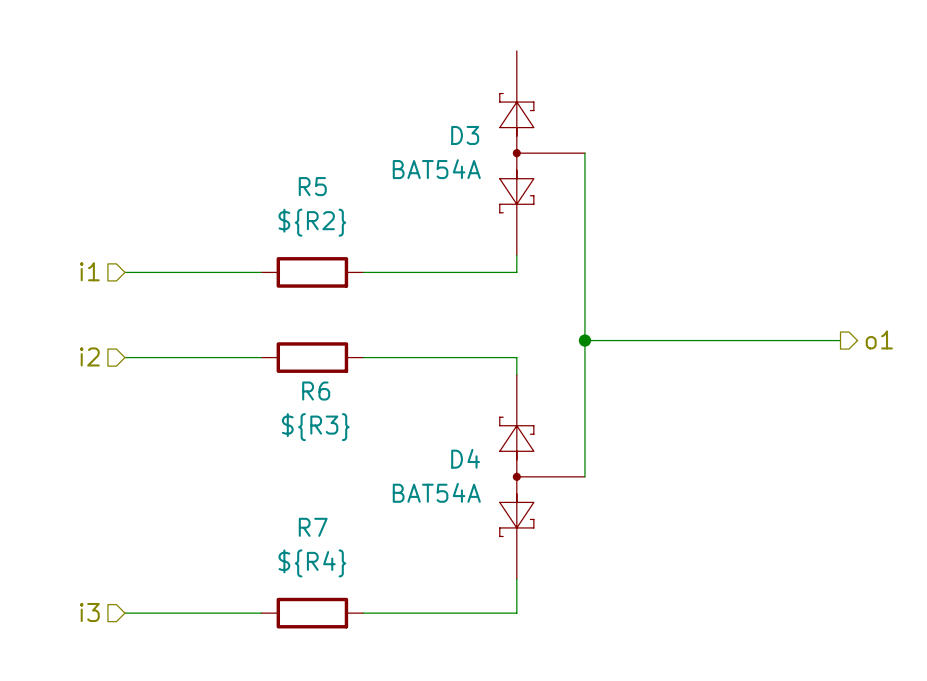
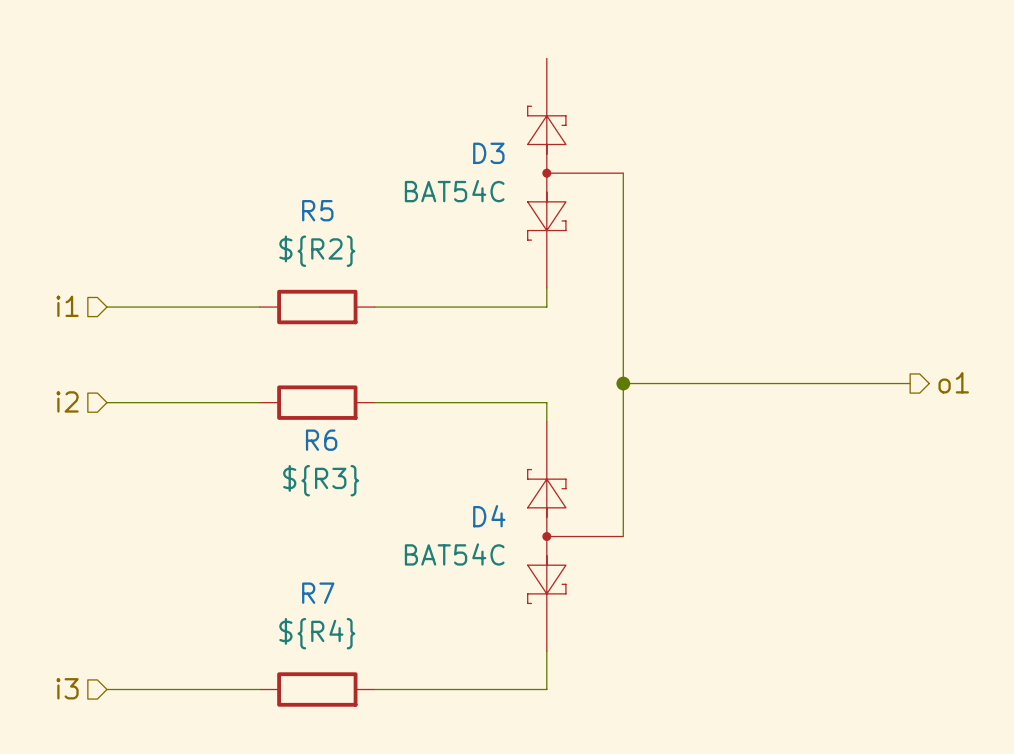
D3 value: BAT54A (436, 169) -> BAT54C (454, 191)
D4 value: BAT54A (436, 492) -> BAT54C (454, 554)

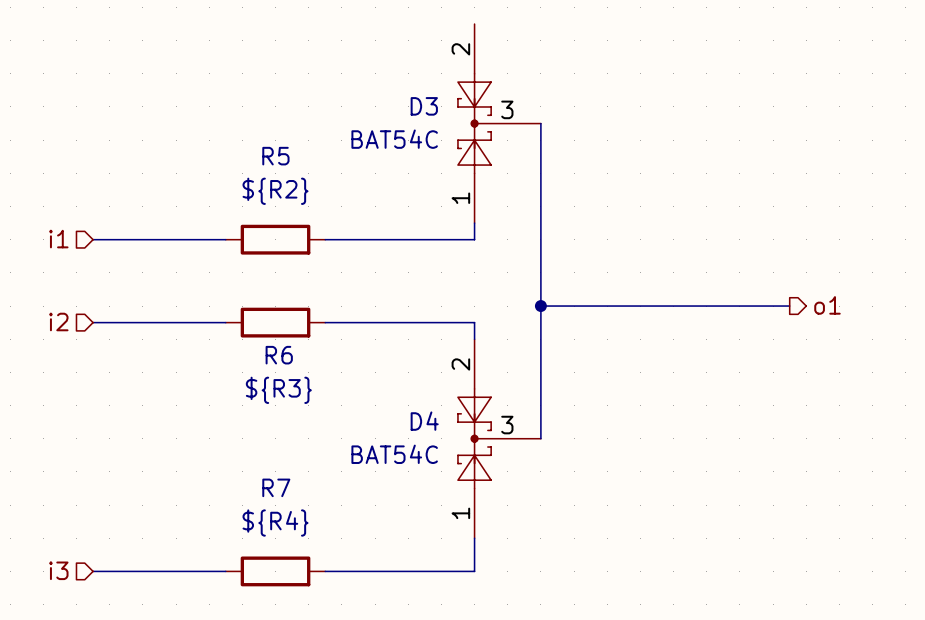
D3 symbol: [527, 58, 624, 288] -> [457, 24, 541, 224]
D4 symbol: [527, 421, 624, 652] -> [457, 339, 541, 539]

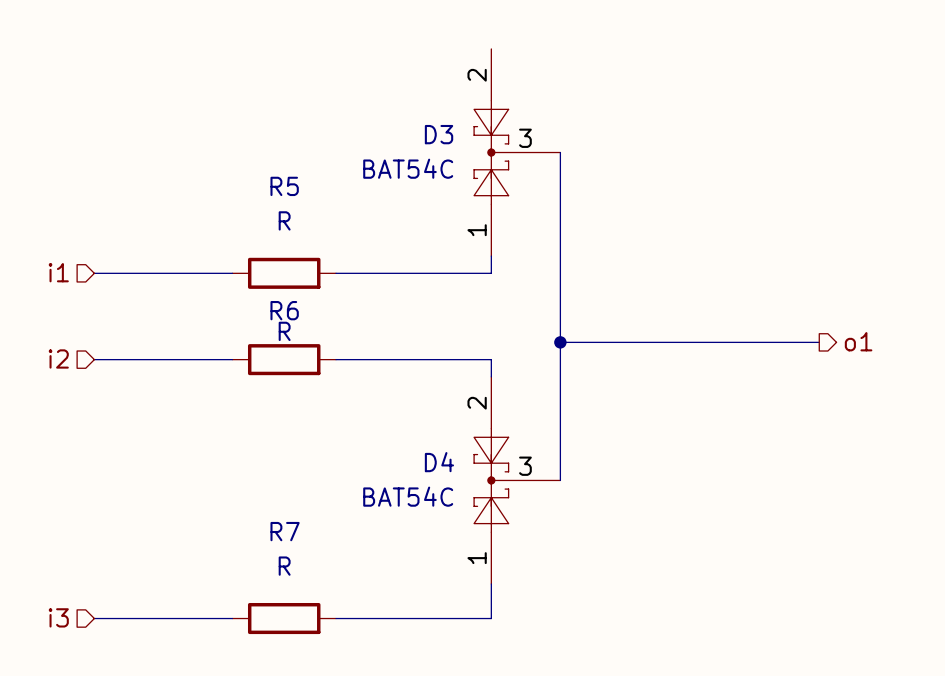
R5 value: ${R2} (275, 191) -> R (284, 220)
R6 name position: R6 (279, 355) -> R6 (284, 310)
R6 value: ${R3} (278, 390) -> R (284, 331)
R7 value: ${R4} (275, 523) -> R (284, 566)

